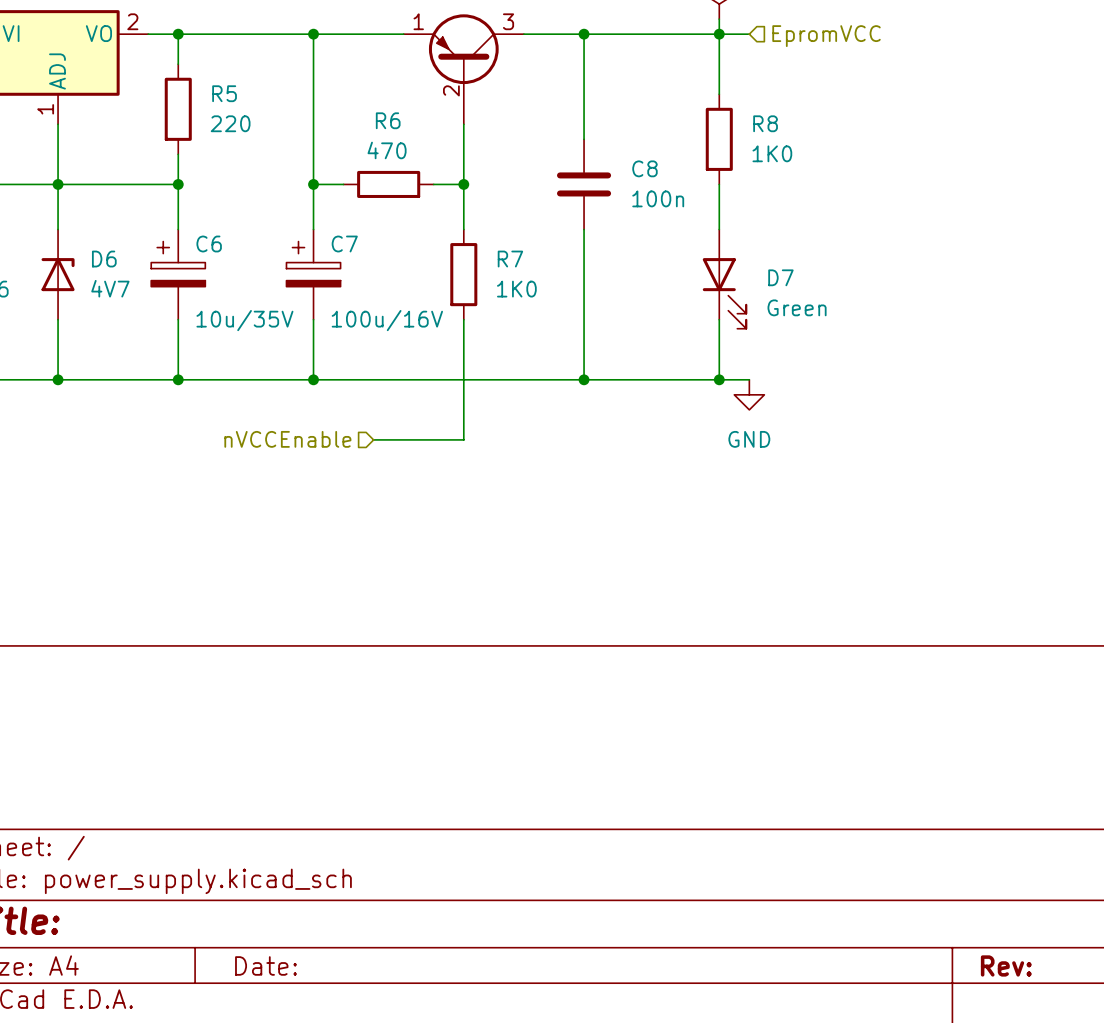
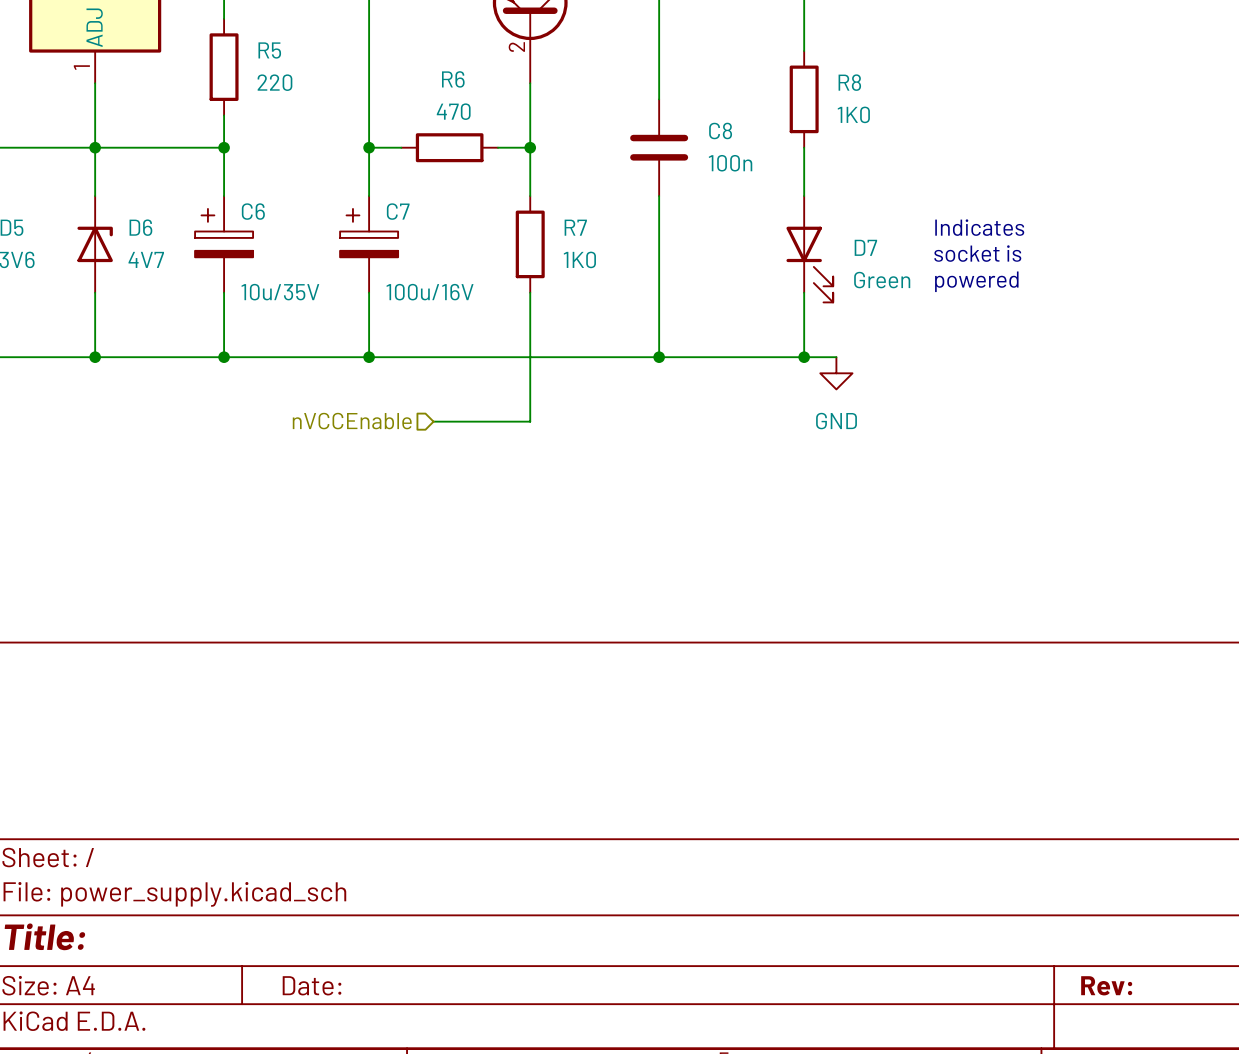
text: none -> Indicates (979, 227)
text: none -> socket is (977, 253)
text: none -> powered (976, 281)

